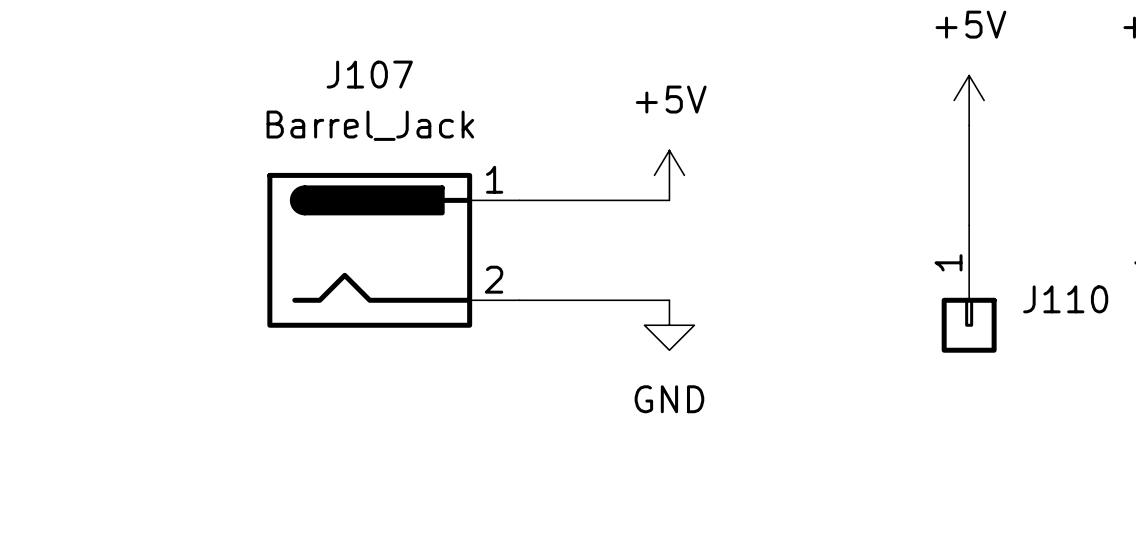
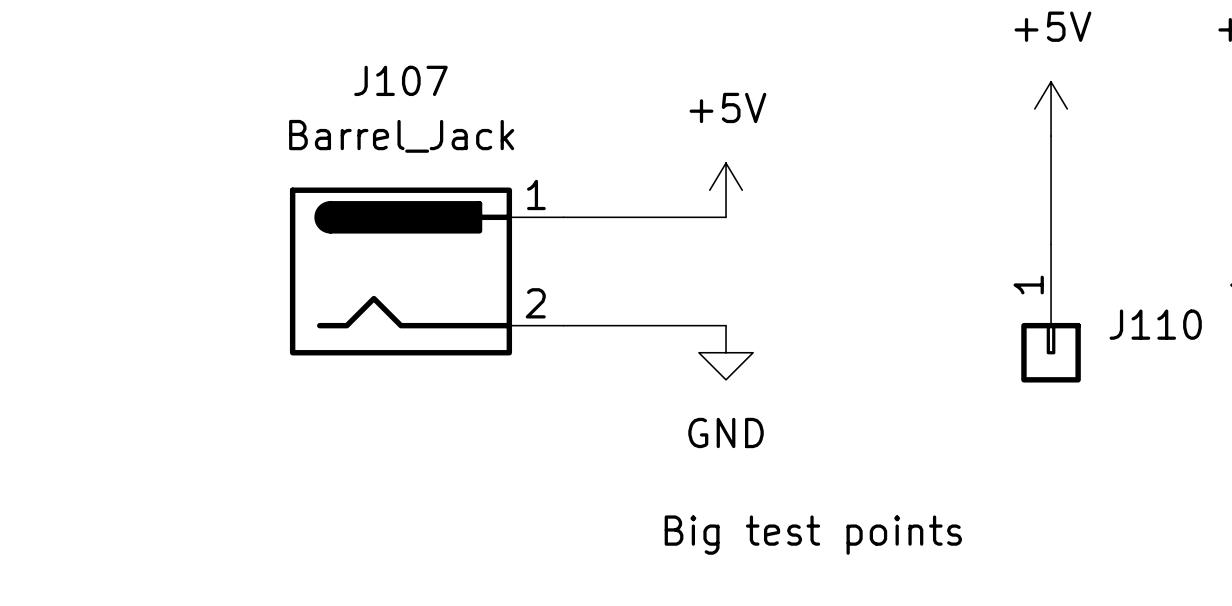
text: none -> Big test points (813, 535)

